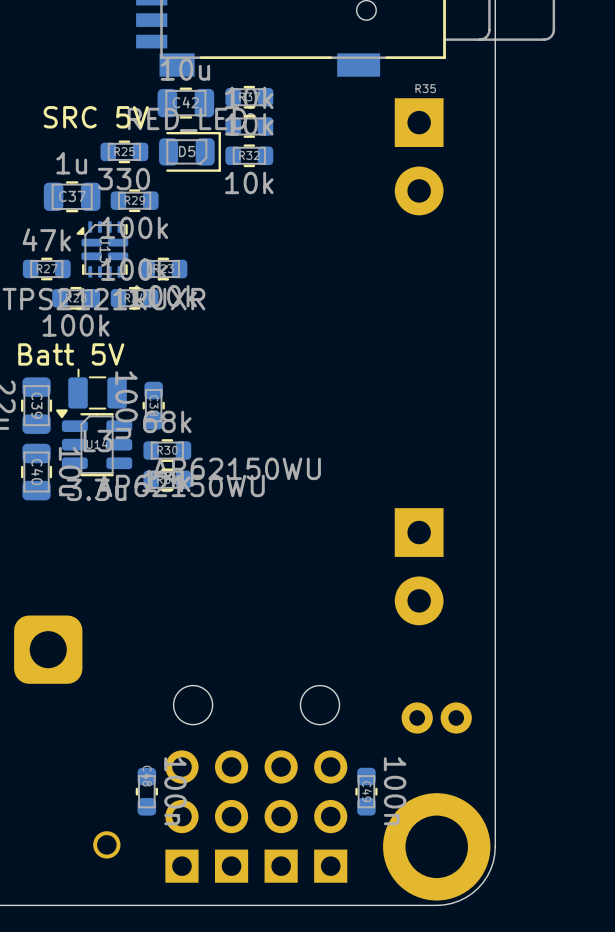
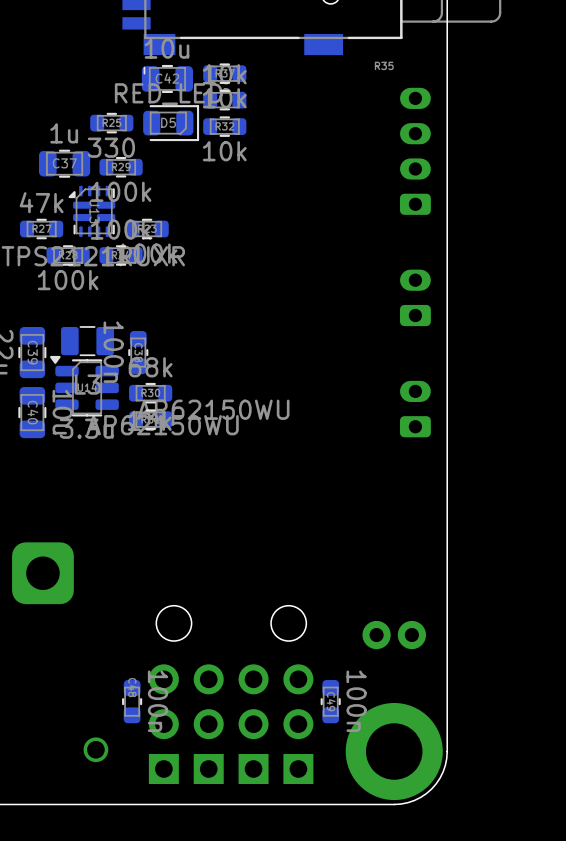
text: SRC 5V (96, 117) -> none
part: (419, 156) -> none
part: none -> (415, 151)
part: none -> (415, 297)
text: Batt 5V (71, 354) -> none
line: (78, 369) (78, 376) -> (144, 67) (144, 73)
part: none -> (415, 409)
part: (419, 566) -> none

